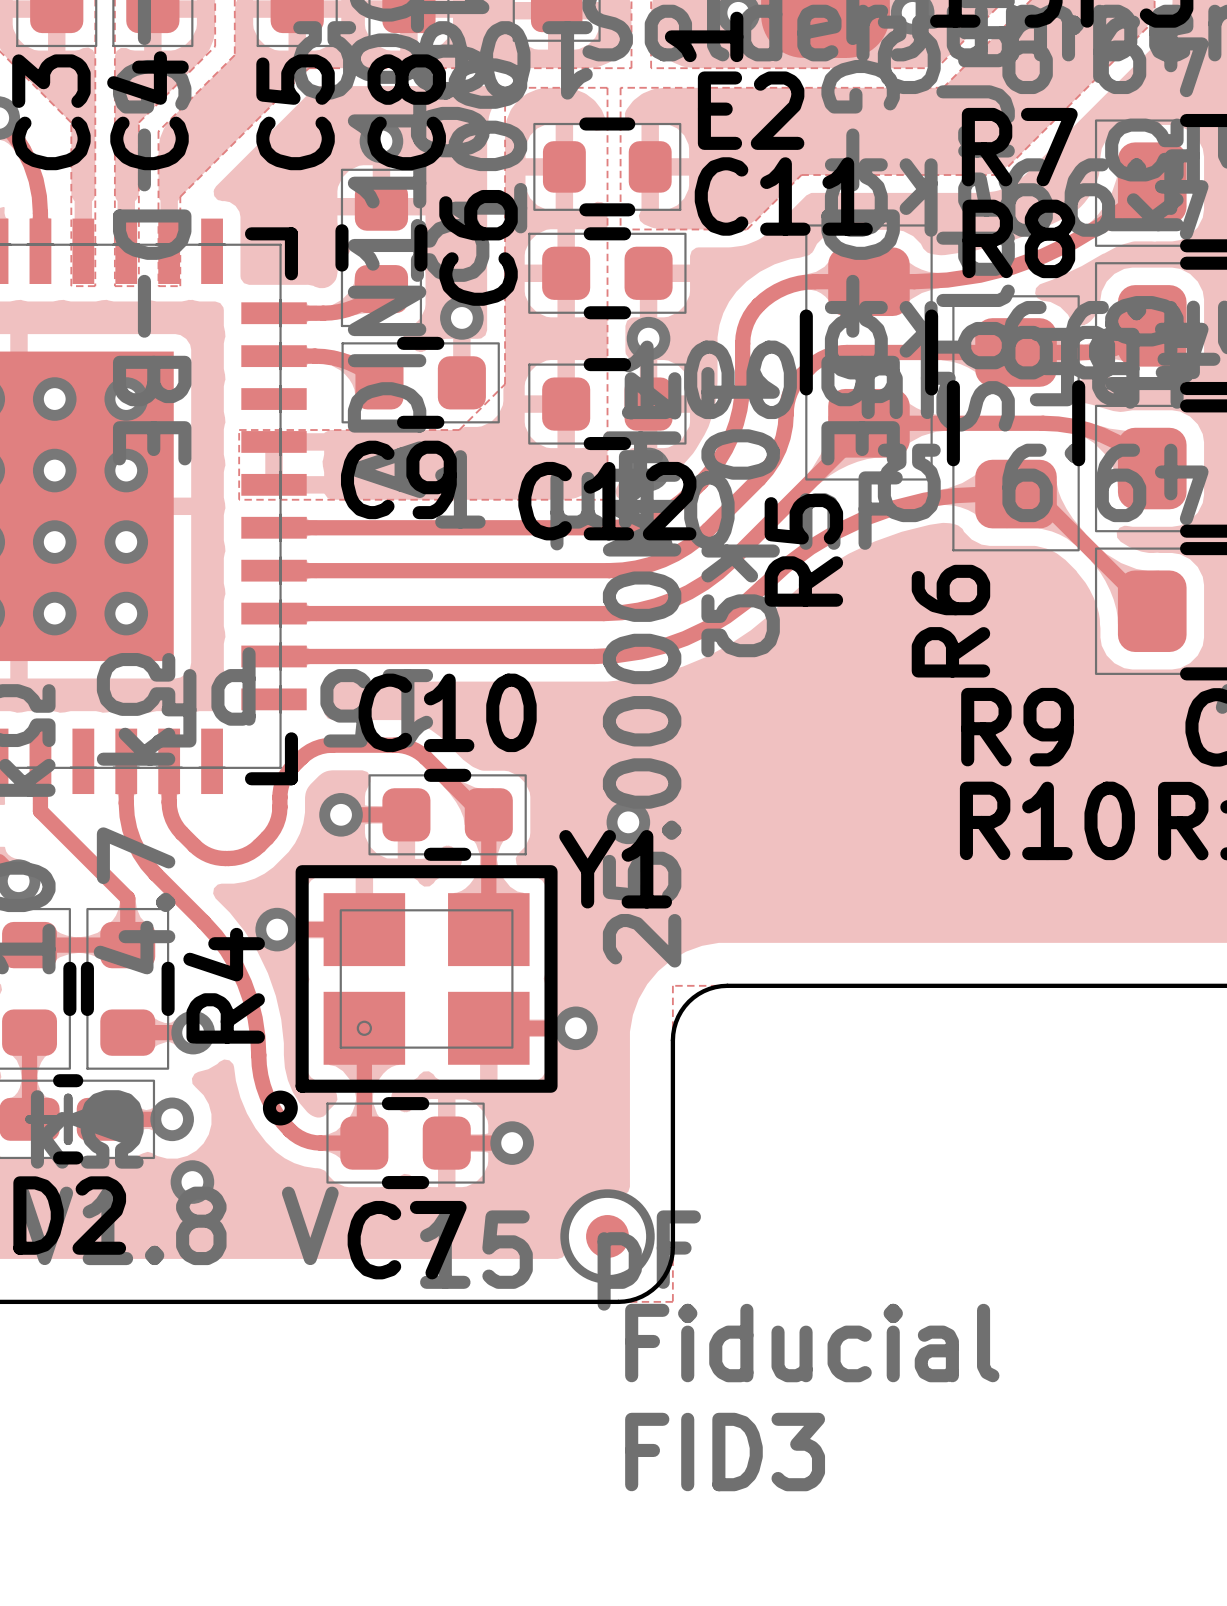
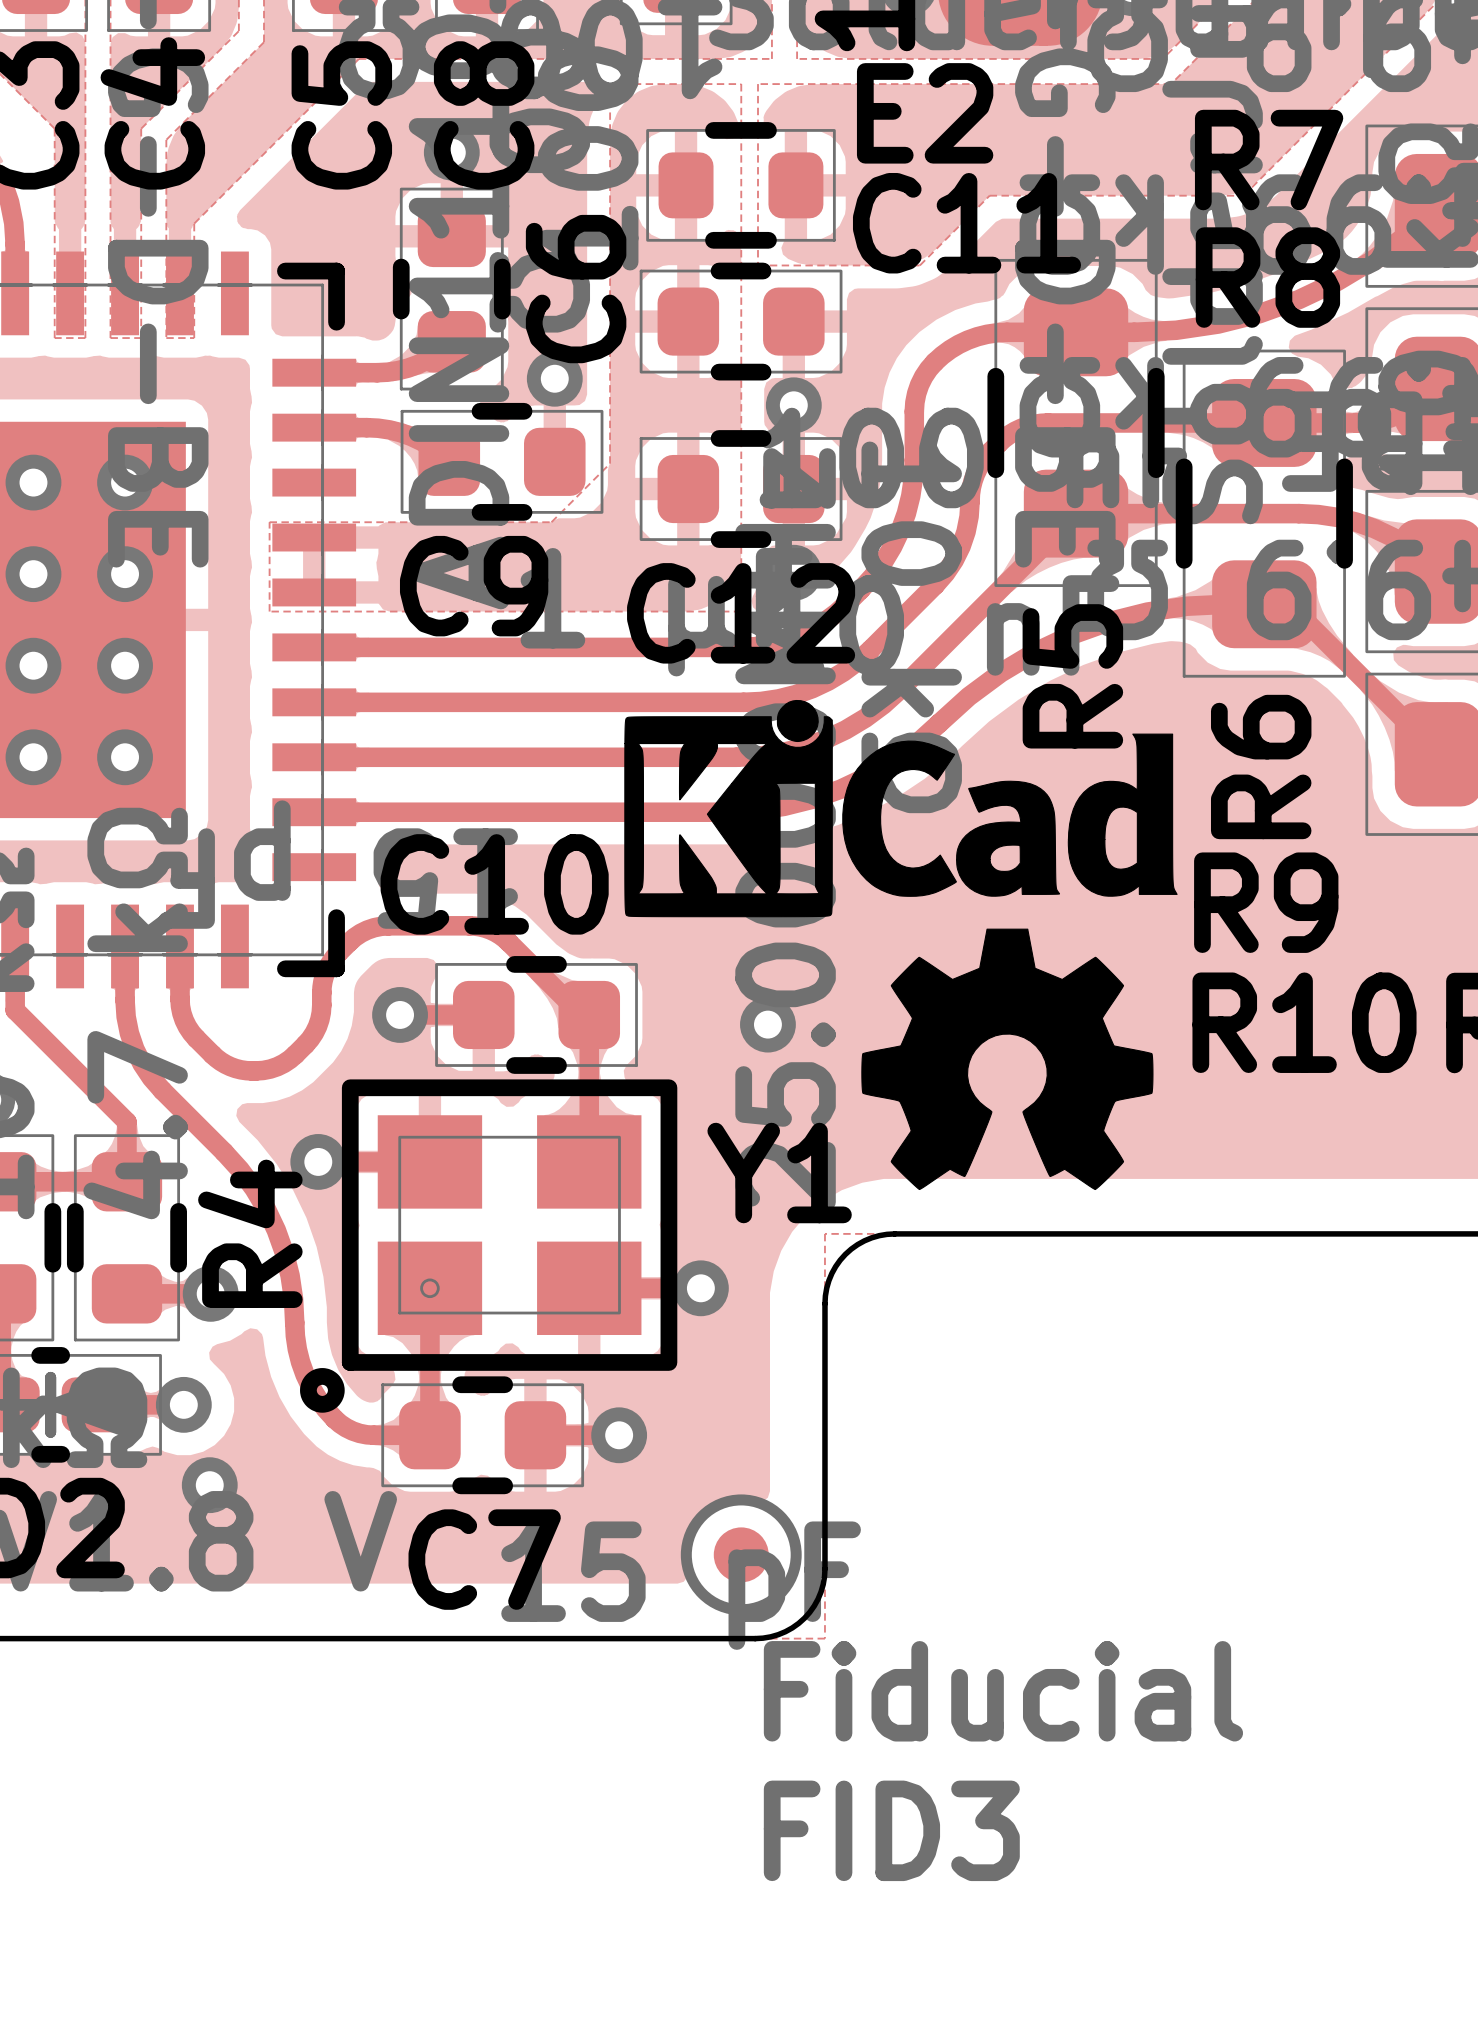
R5 name position: R5 (803, 550) -> R5 (1072, 676)
drawing: none -> [624, 699, 1178, 1191]
R6 name position: R6 (950, 621) -> R6 (1261, 766)
C10 name position: C10 (447, 712) -> C10 (494, 884)
Y1 name position: Y1 (615, 869) -> Y1 (779, 1173)

